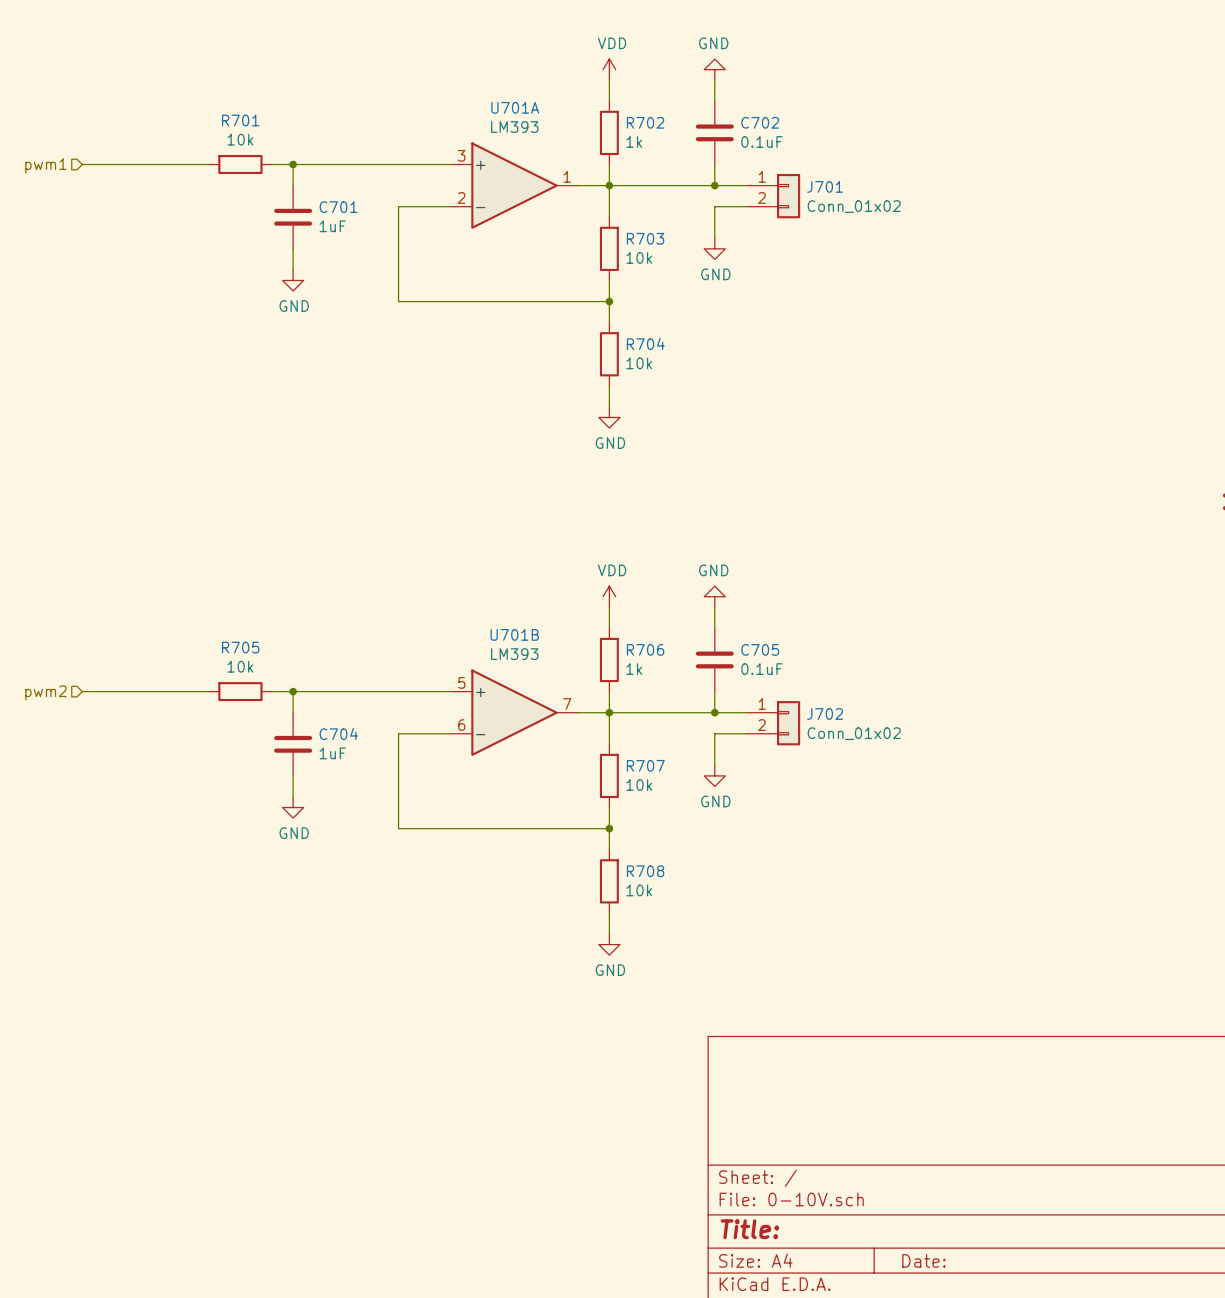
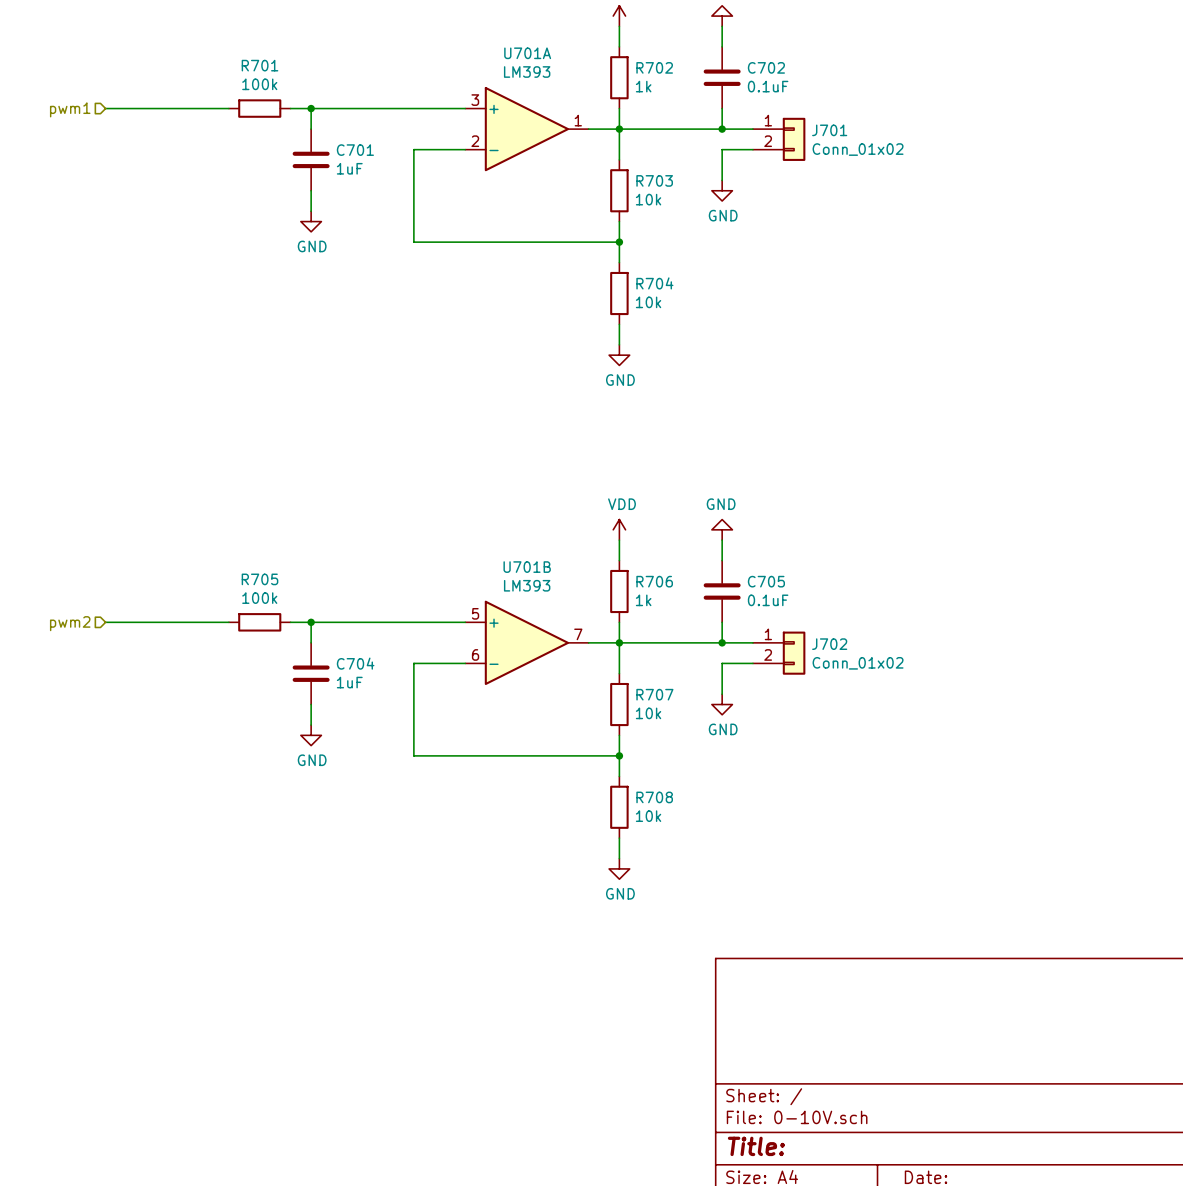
R701 value: 10k (240, 139) -> 100k (259, 84)
R705 value: 10k (240, 666) -> 100k (259, 598)

